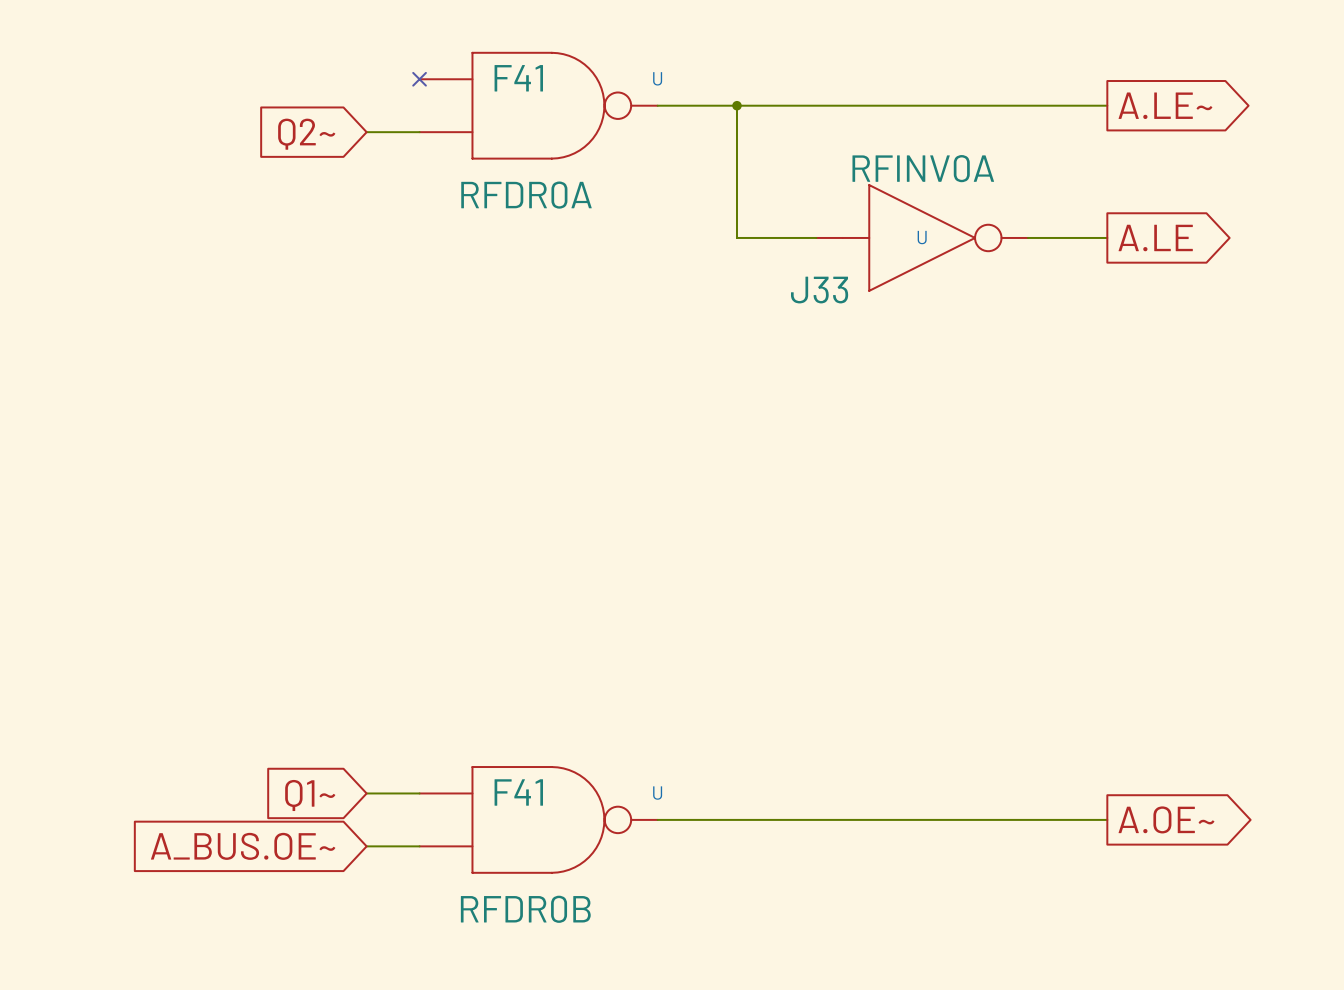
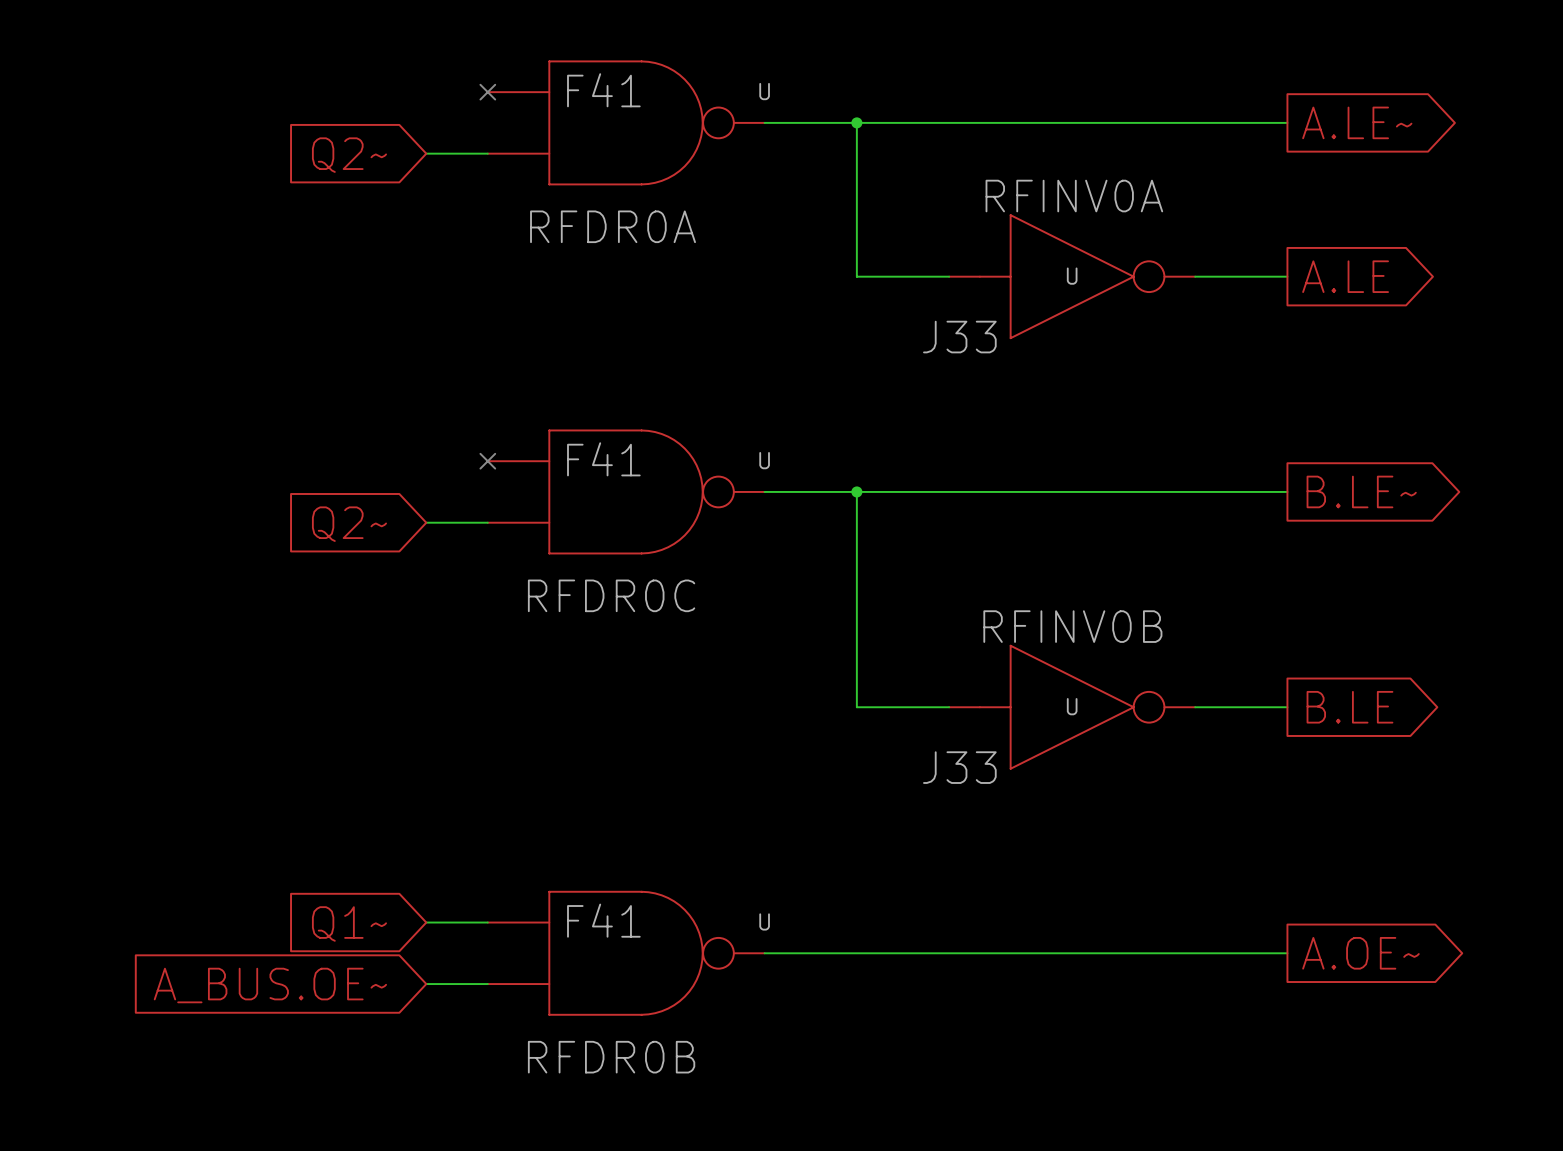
no-connect mark: none -> (487, 461)
U: none -> (626, 491)
wire: none -> (764, 491) (1287, 491)
wire: none -> (856, 491) (856, 707) (949, 707)
junction: none -> (856, 491)
global label: none -> B.LE~ (1361, 491)
wire: none -> (426, 522) (487, 522)
global label: none -> Q2~ (349, 524)
U: none -> (1072, 707)
wire: none -> (1195, 707) (1287, 707)
global label: none -> B.LE (1349, 707)

